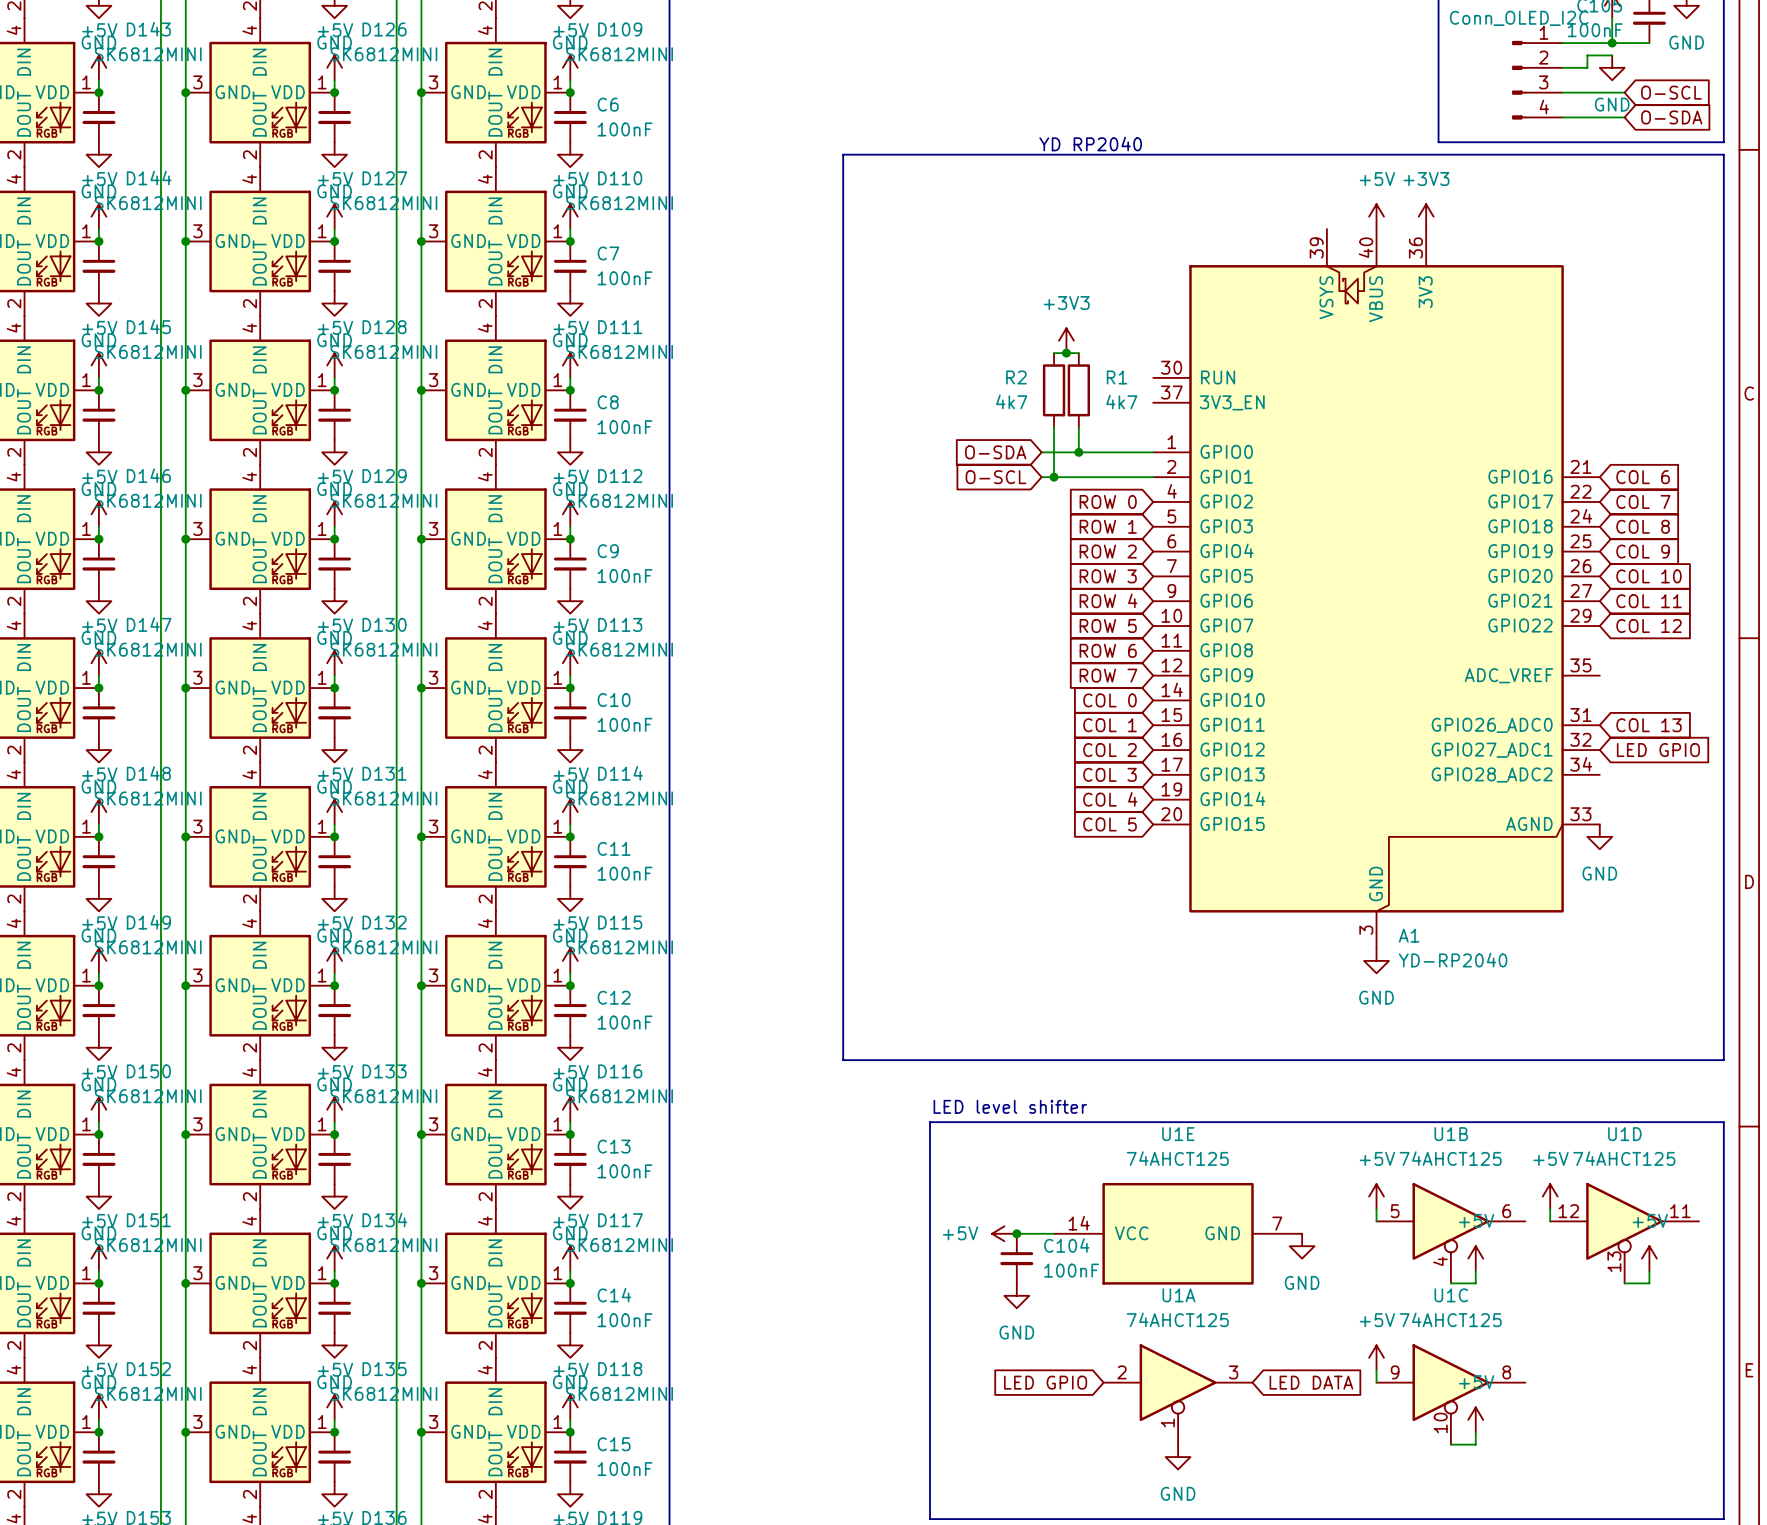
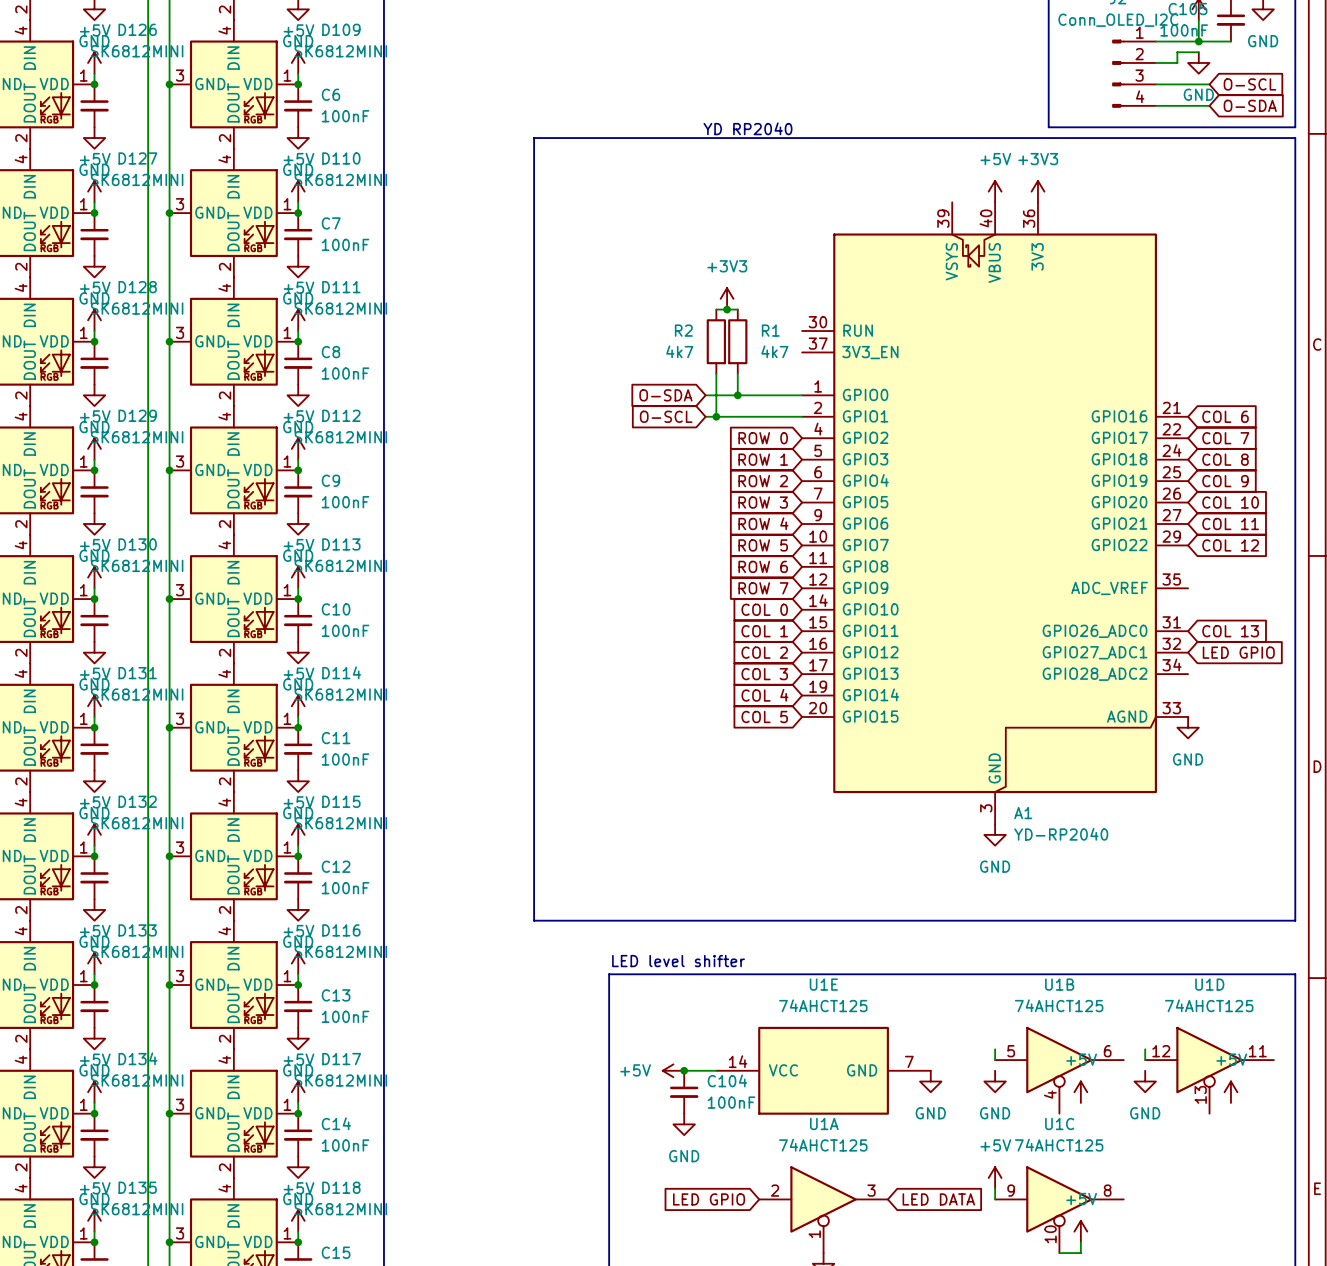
power symbol: +5V (1376, 1196) -> none
power symbol: +5V (1550, 1196) -> none
power symbol: none -> GND (995, 1081)
power symbol: none -> GND (1145, 1081)
wire: (1475, 1271) (1475, 1283) (1450, 1283) -> none
wire: (1649, 1271) (1649, 1283) (1624, 1283) -> none

